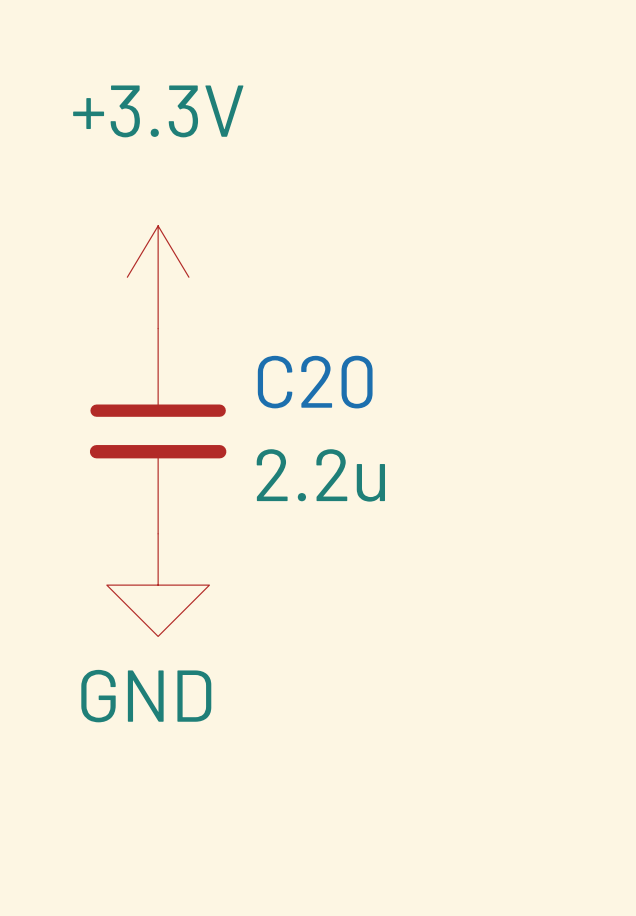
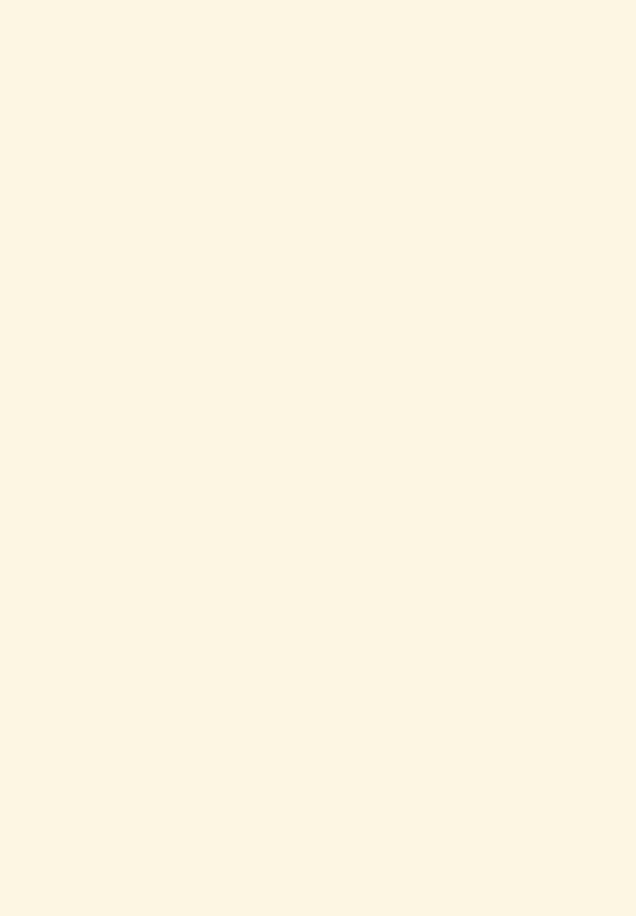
power symbol: +3.3V (158, 277) -> none
C20: 2.2u (158, 431) -> none
power symbol: GND (158, 585) -> none

